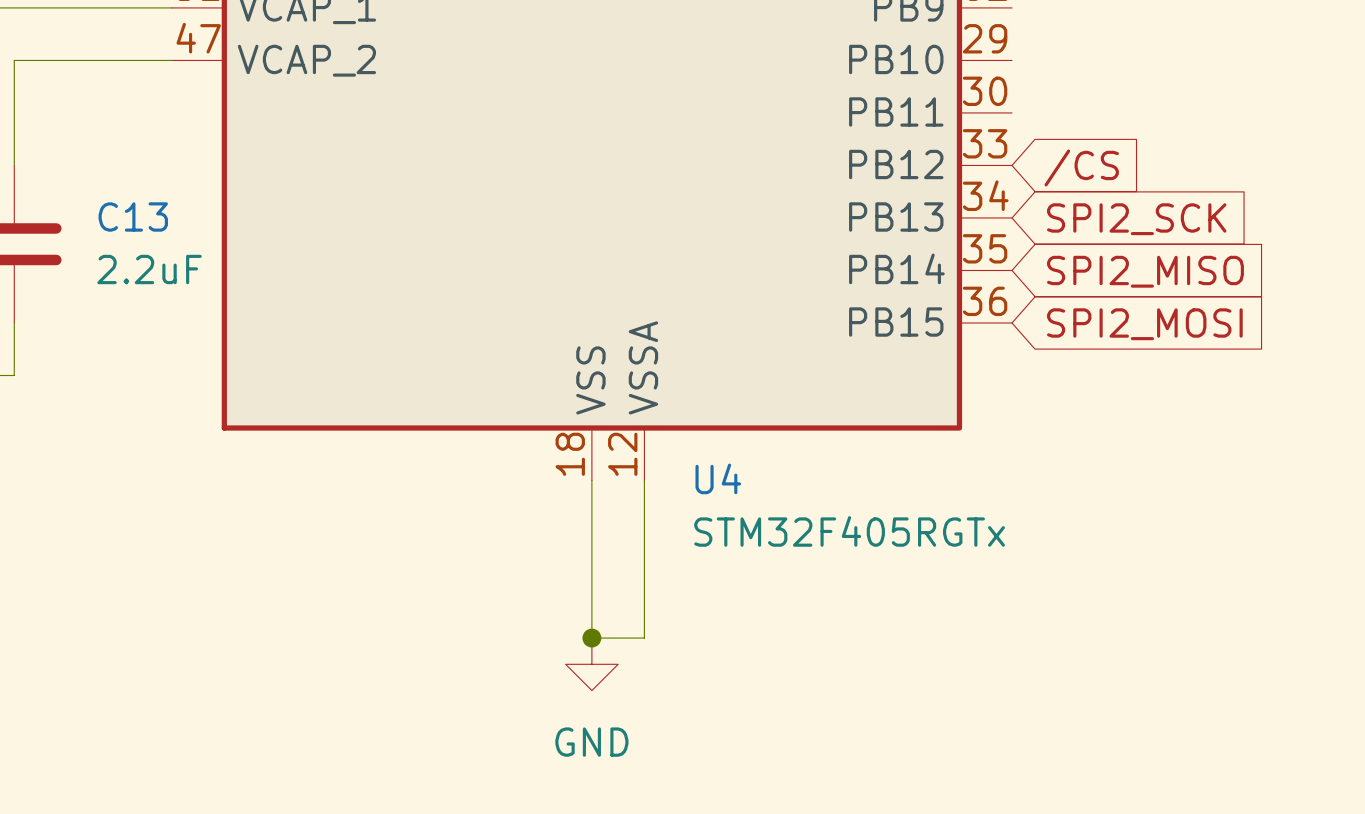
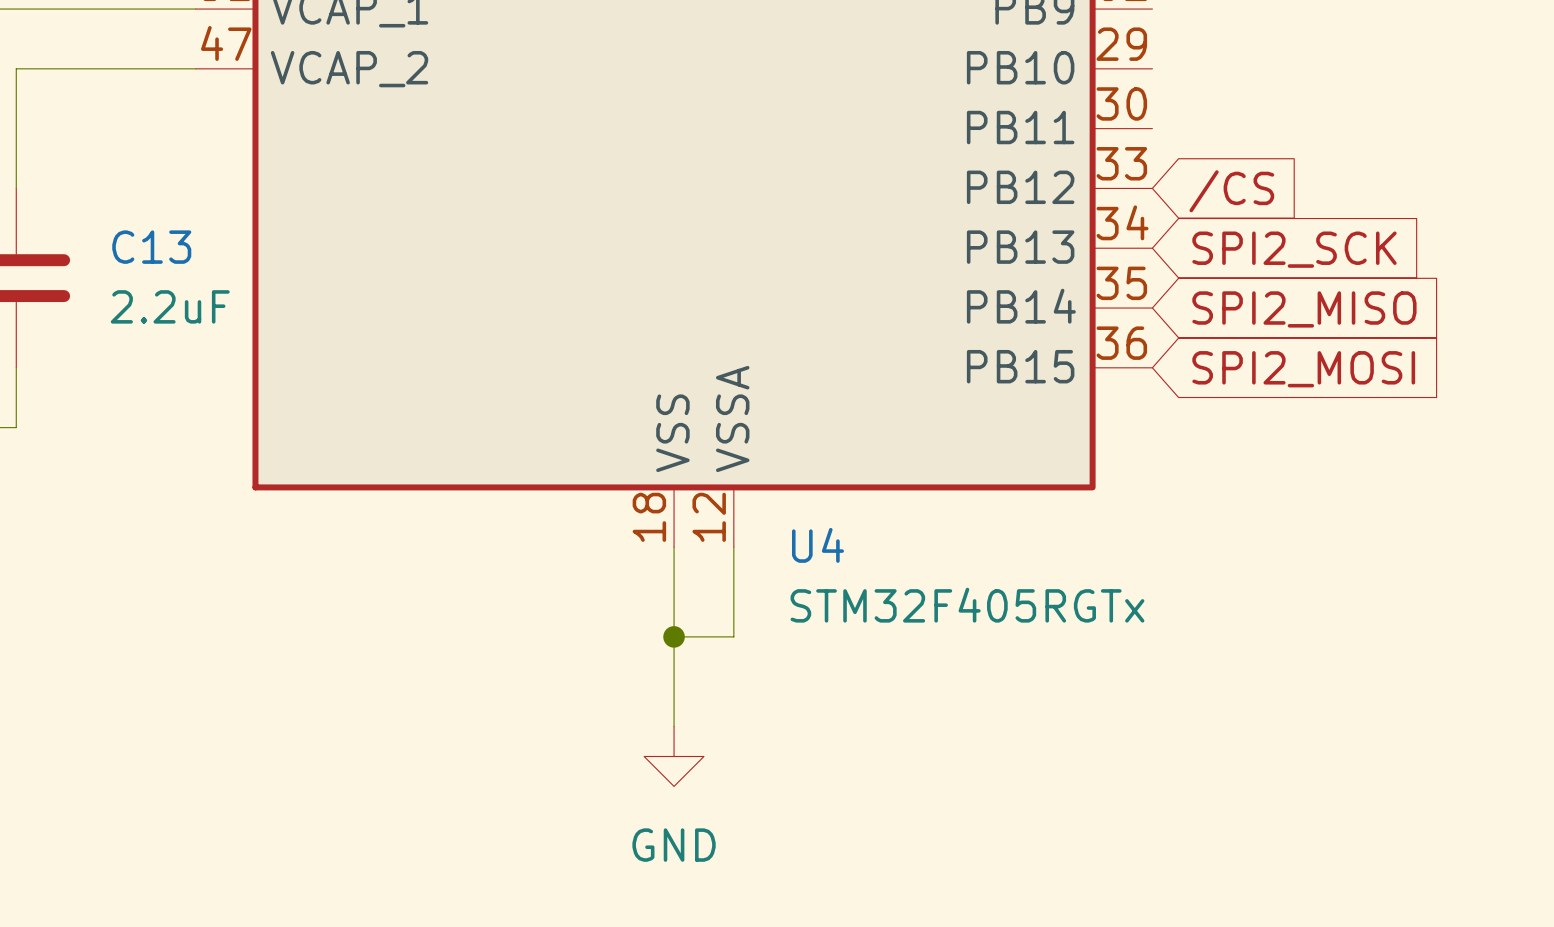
wire: (644, 559) (644, 638) (591, 638) -> (733, 636) (674, 636)
junction position: (591, 638) -> (674, 636)

